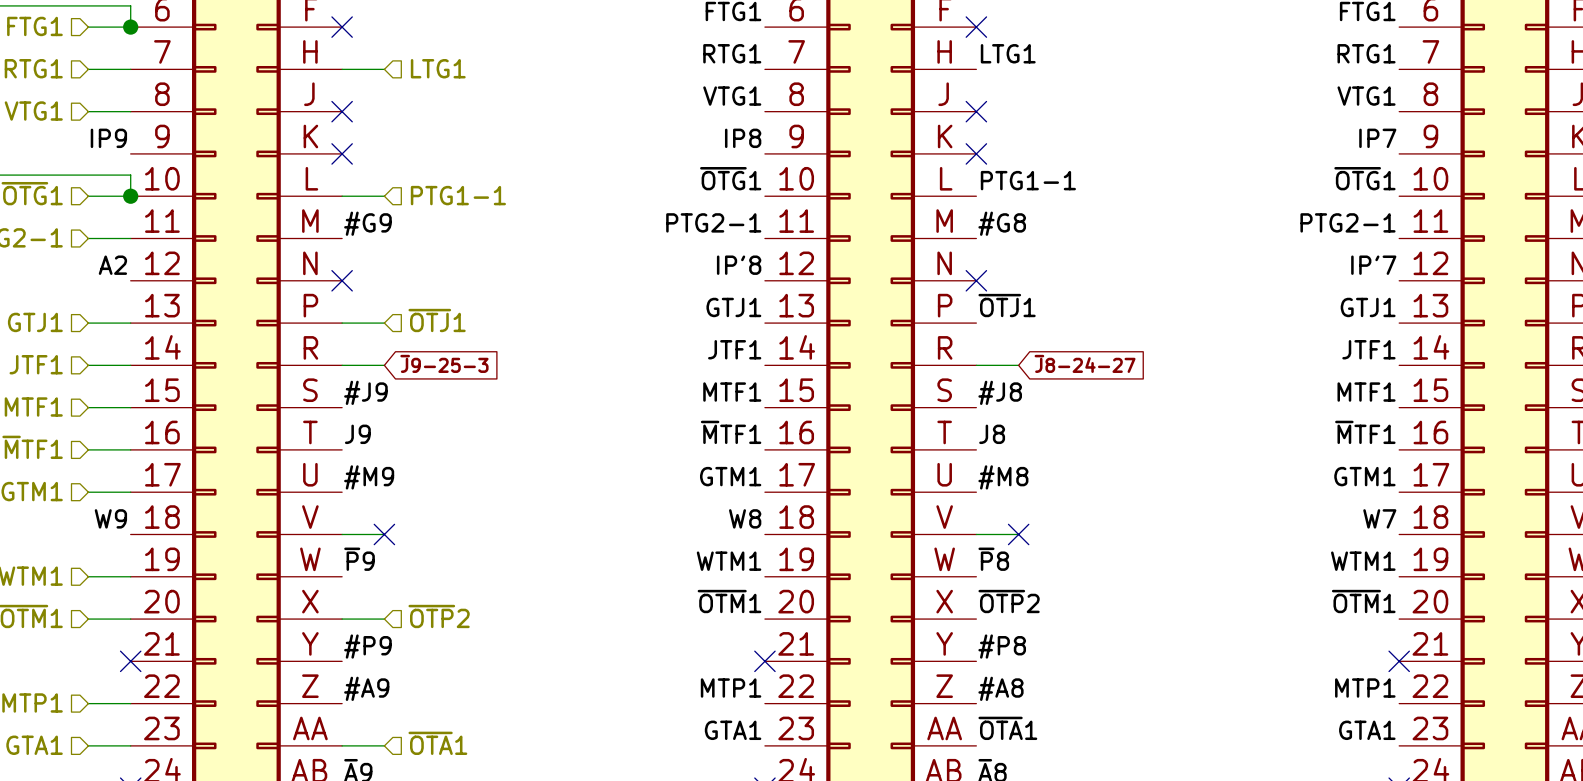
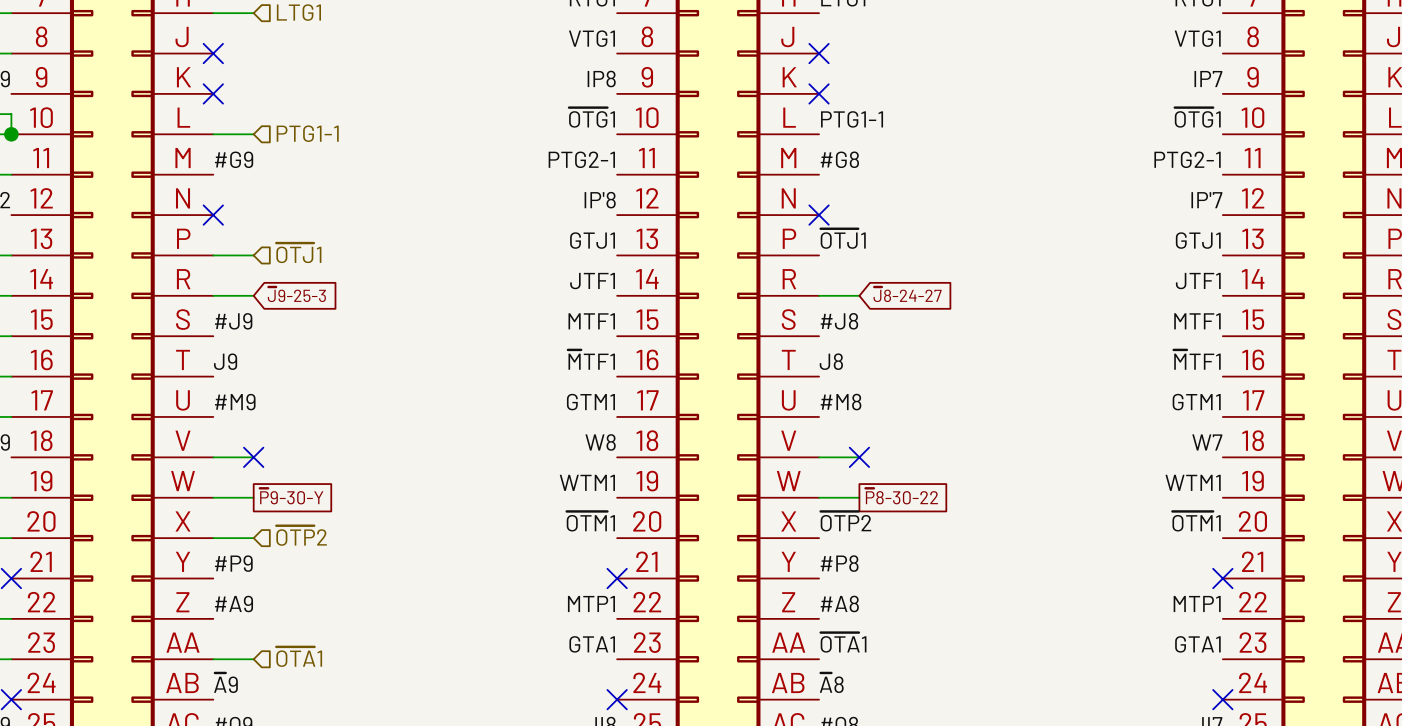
label: ~{P}9 (359, 559) -> none
label: ~{P}8 (993, 559) -> none
global label: none -> ~{P}9-30-Y (291, 496)
global label: none -> ~{P}8-30-22 (901, 496)
wire: none -> (213, 497) (253, 497)
wire: none -> (819, 497) (859, 497)

